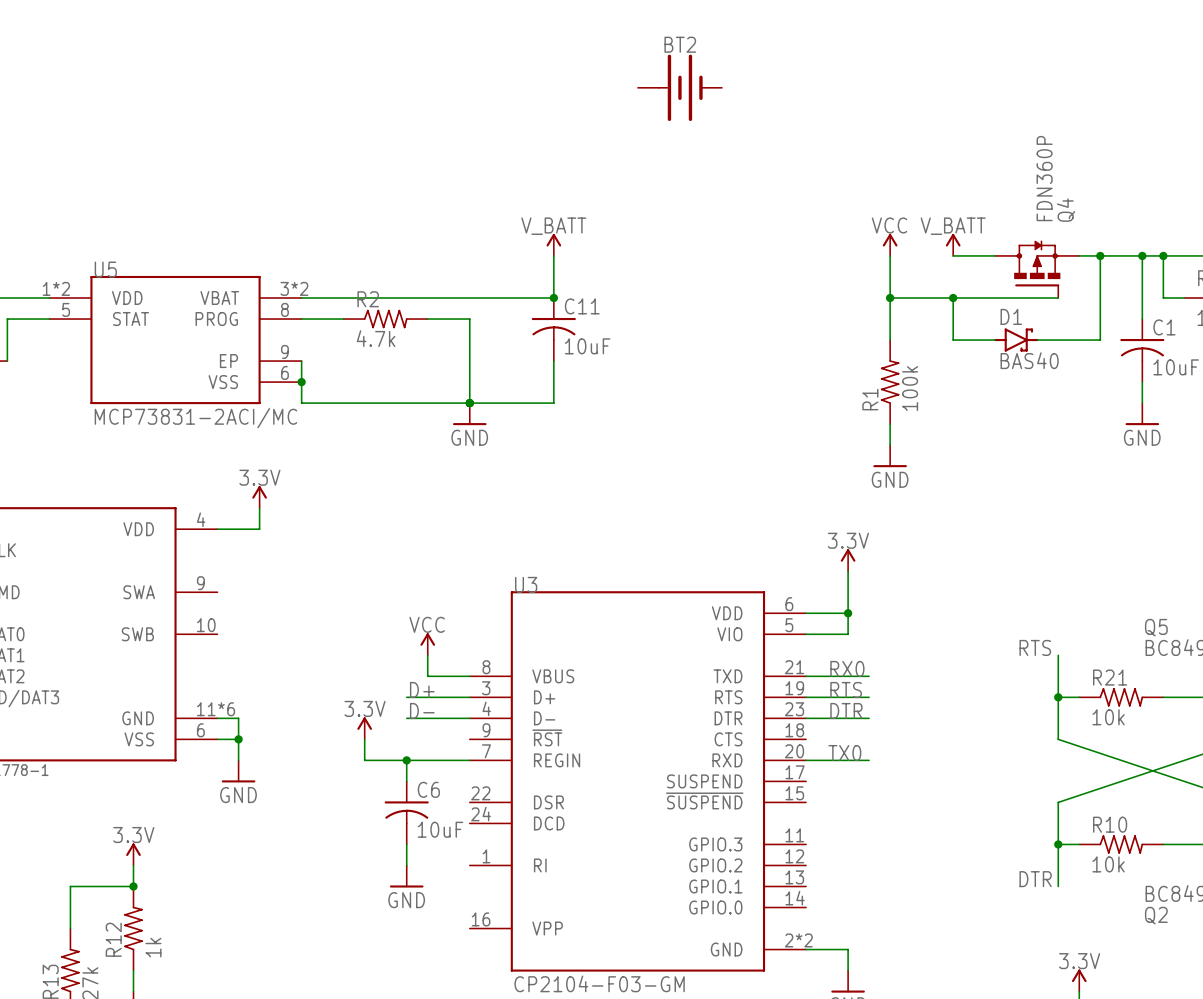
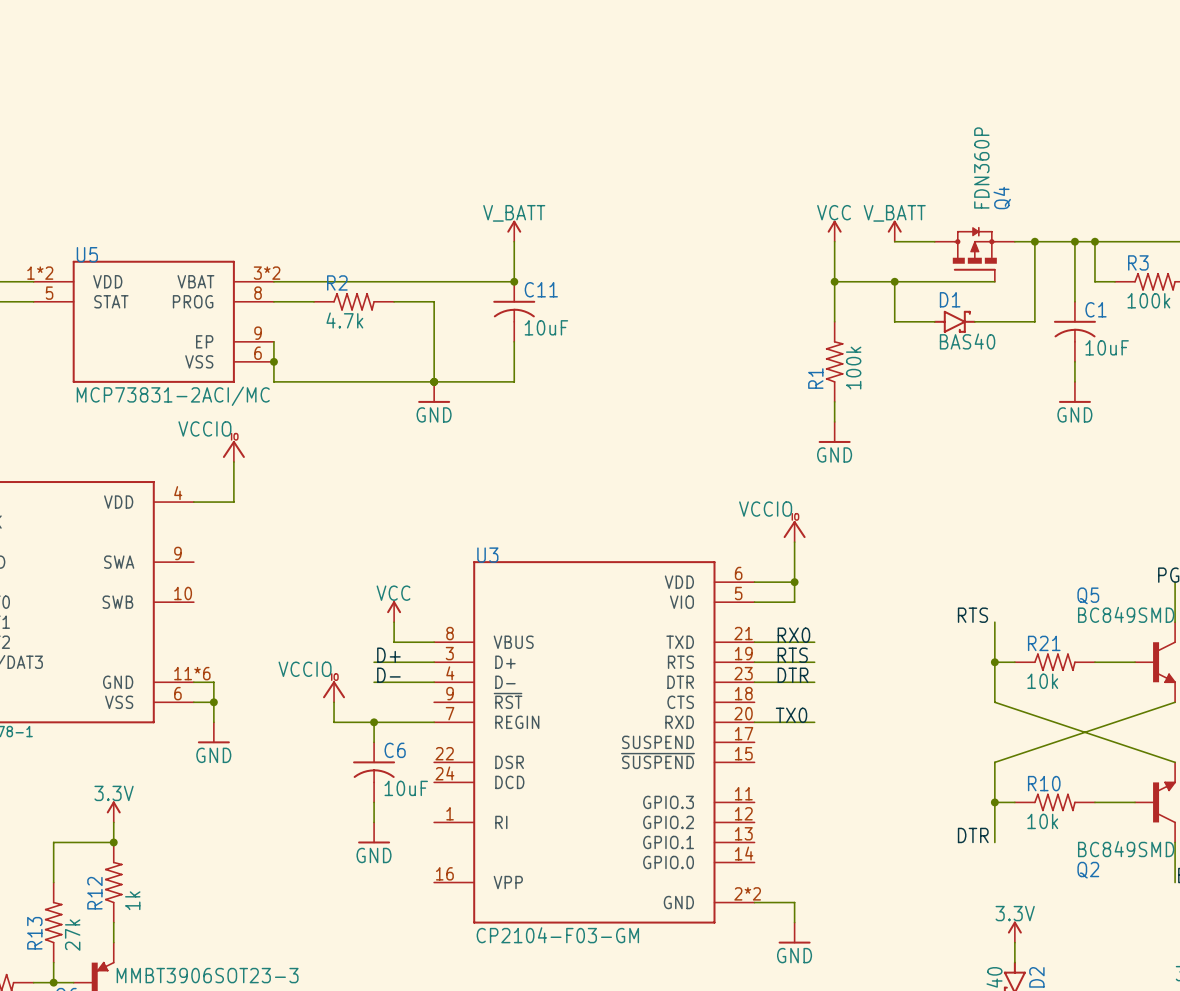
BT2: (679, 87) -> none
power symbol: none -> VCCIO (233, 451)
power symbol: 3.3V (259, 497) -> none
power symbol: 3.3V (848, 560) -> VCCIO (794, 531)
power symbol: 3.3V (364, 728) -> VCCIO (334, 691)

